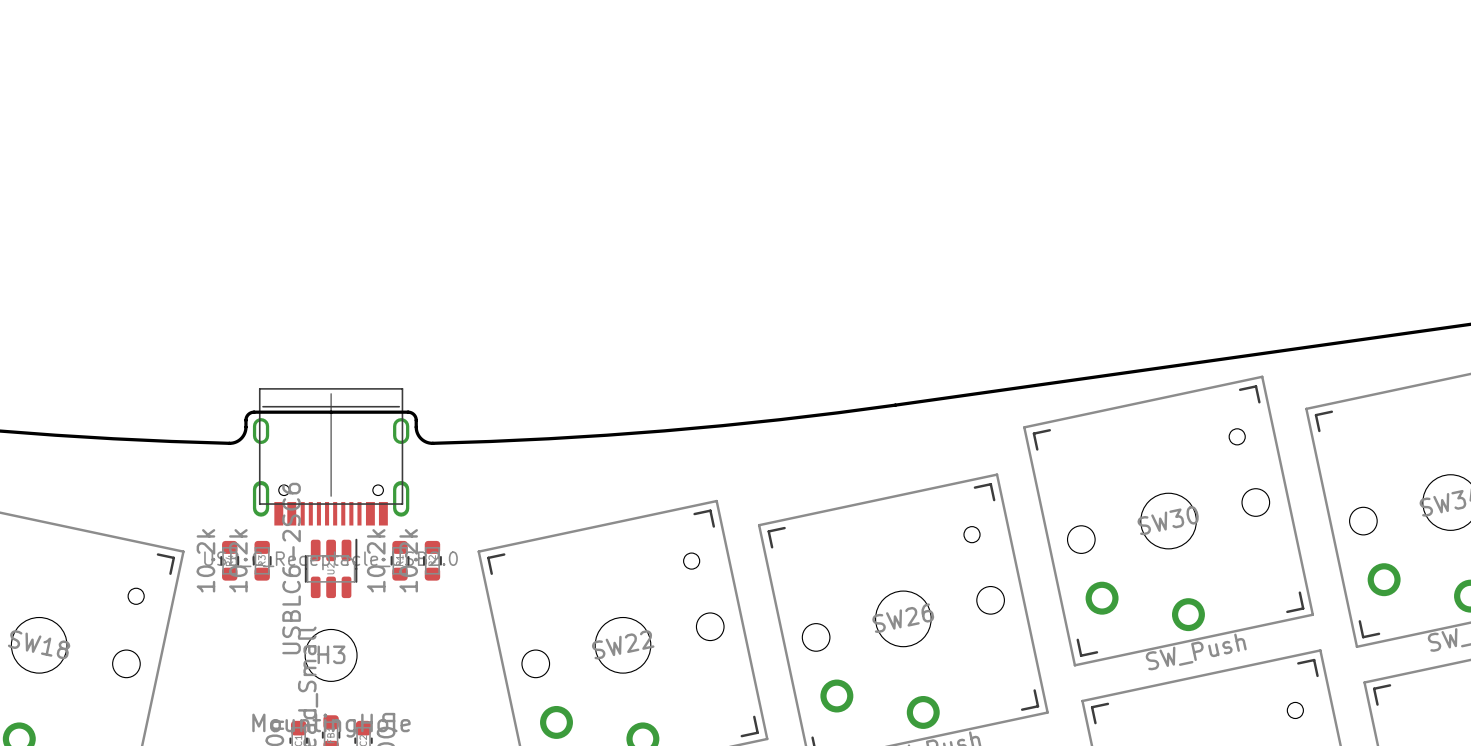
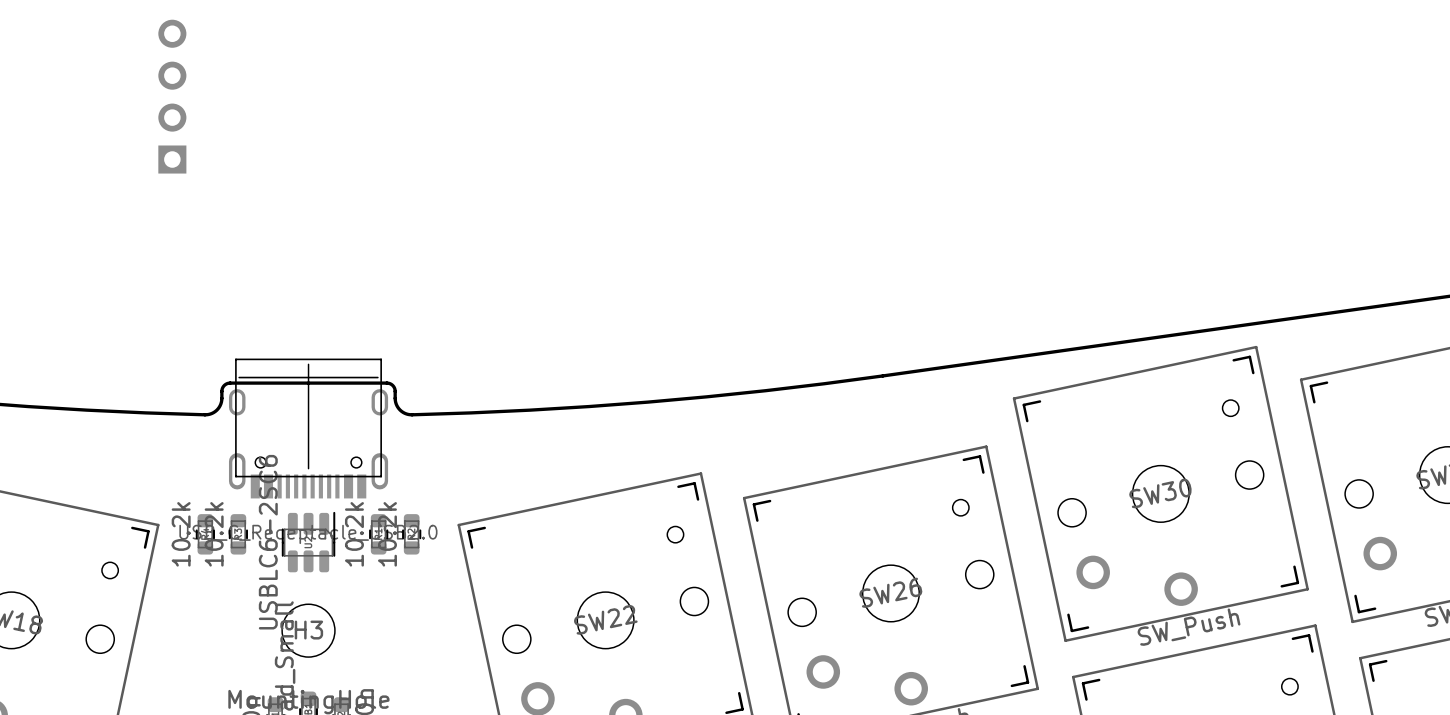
part: none -> (172, 96)

